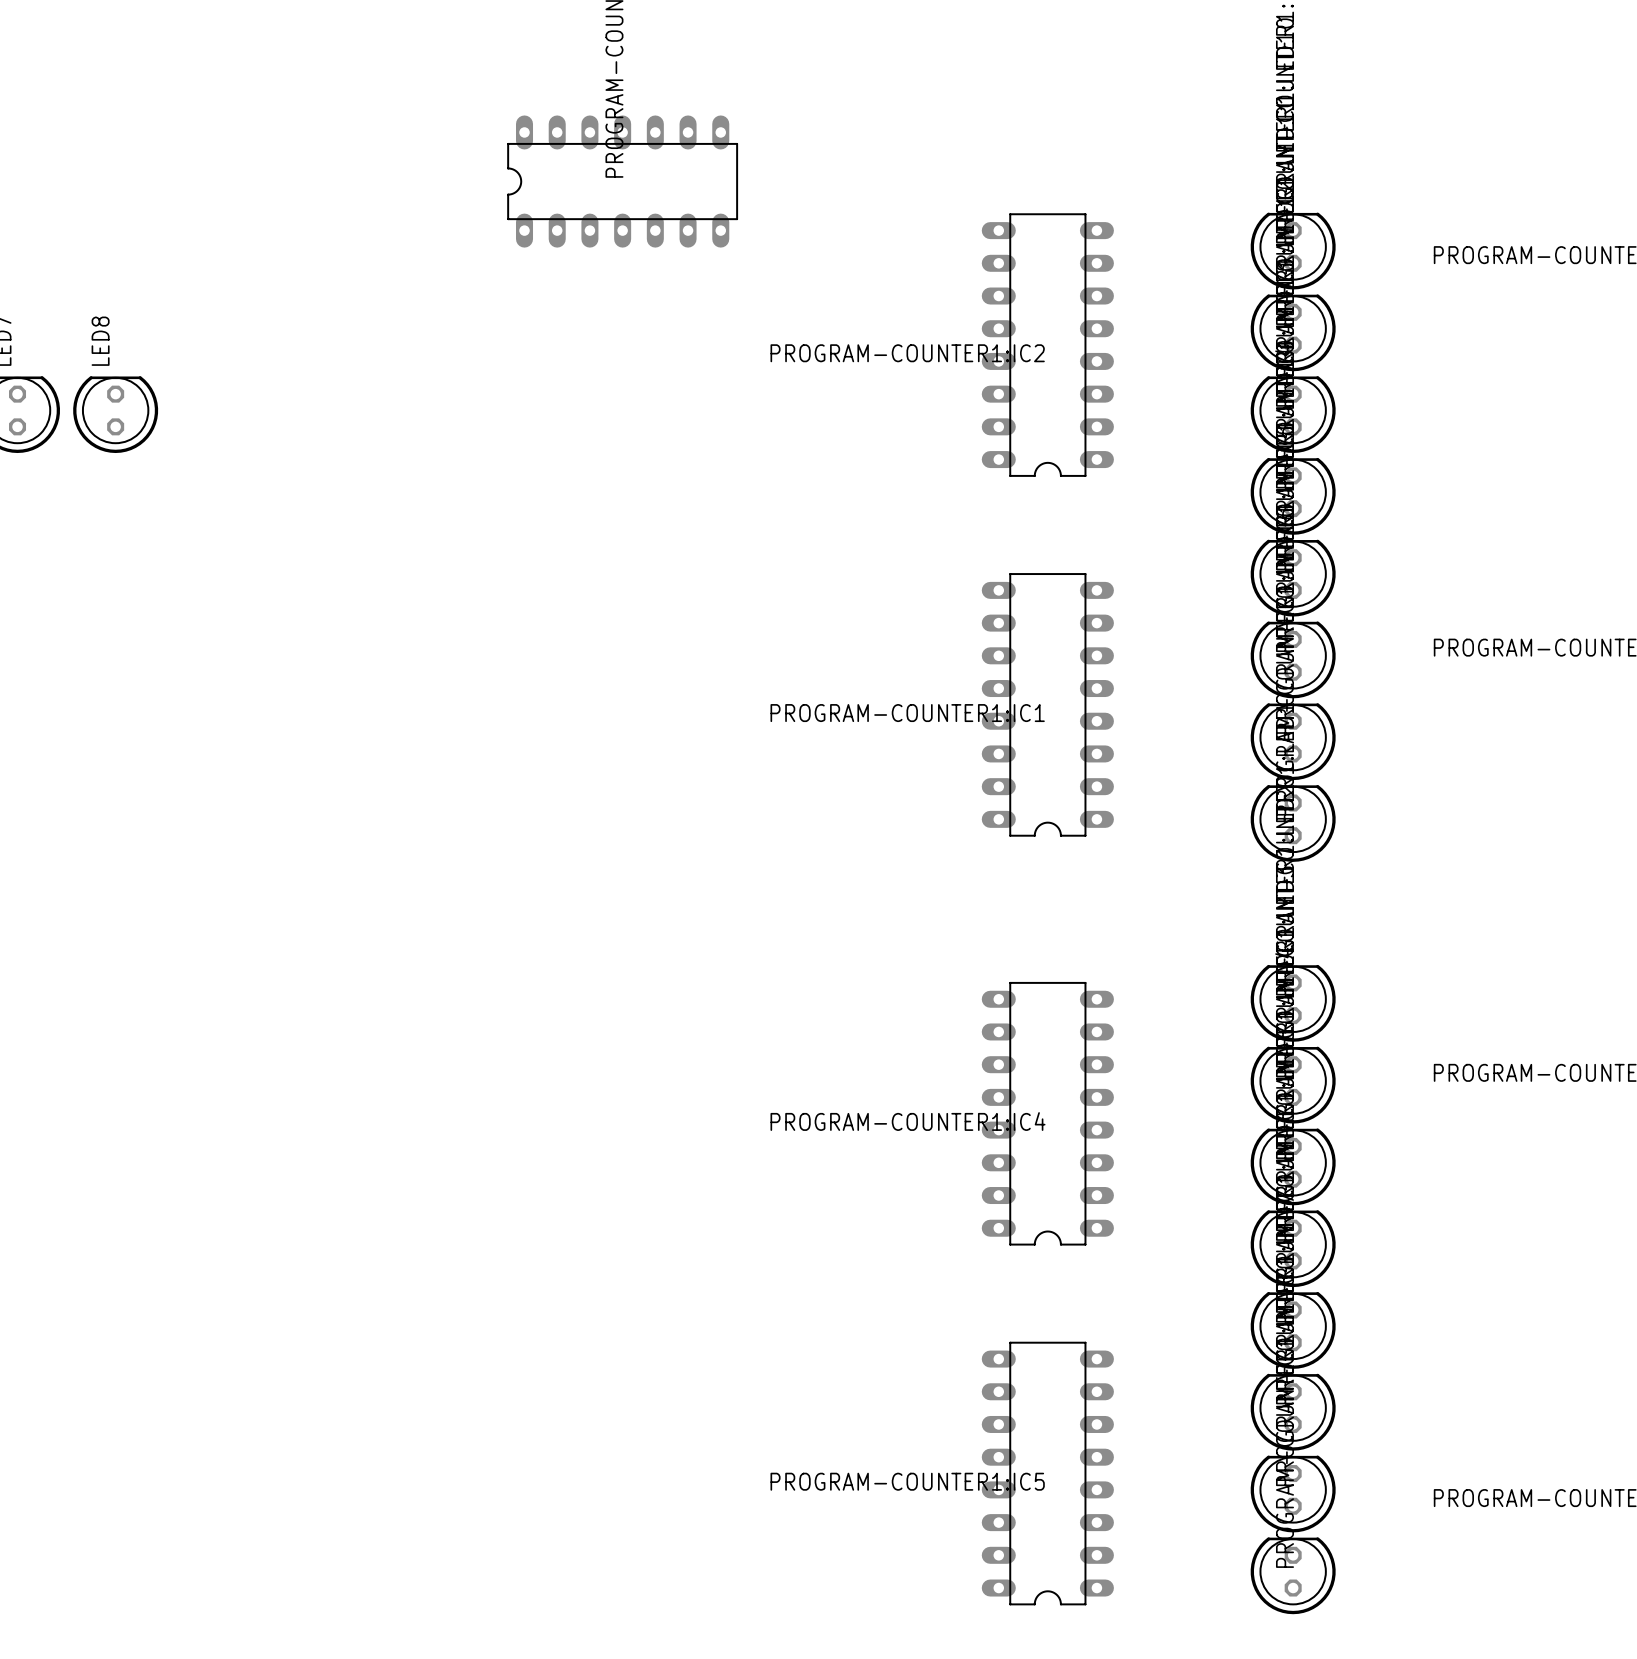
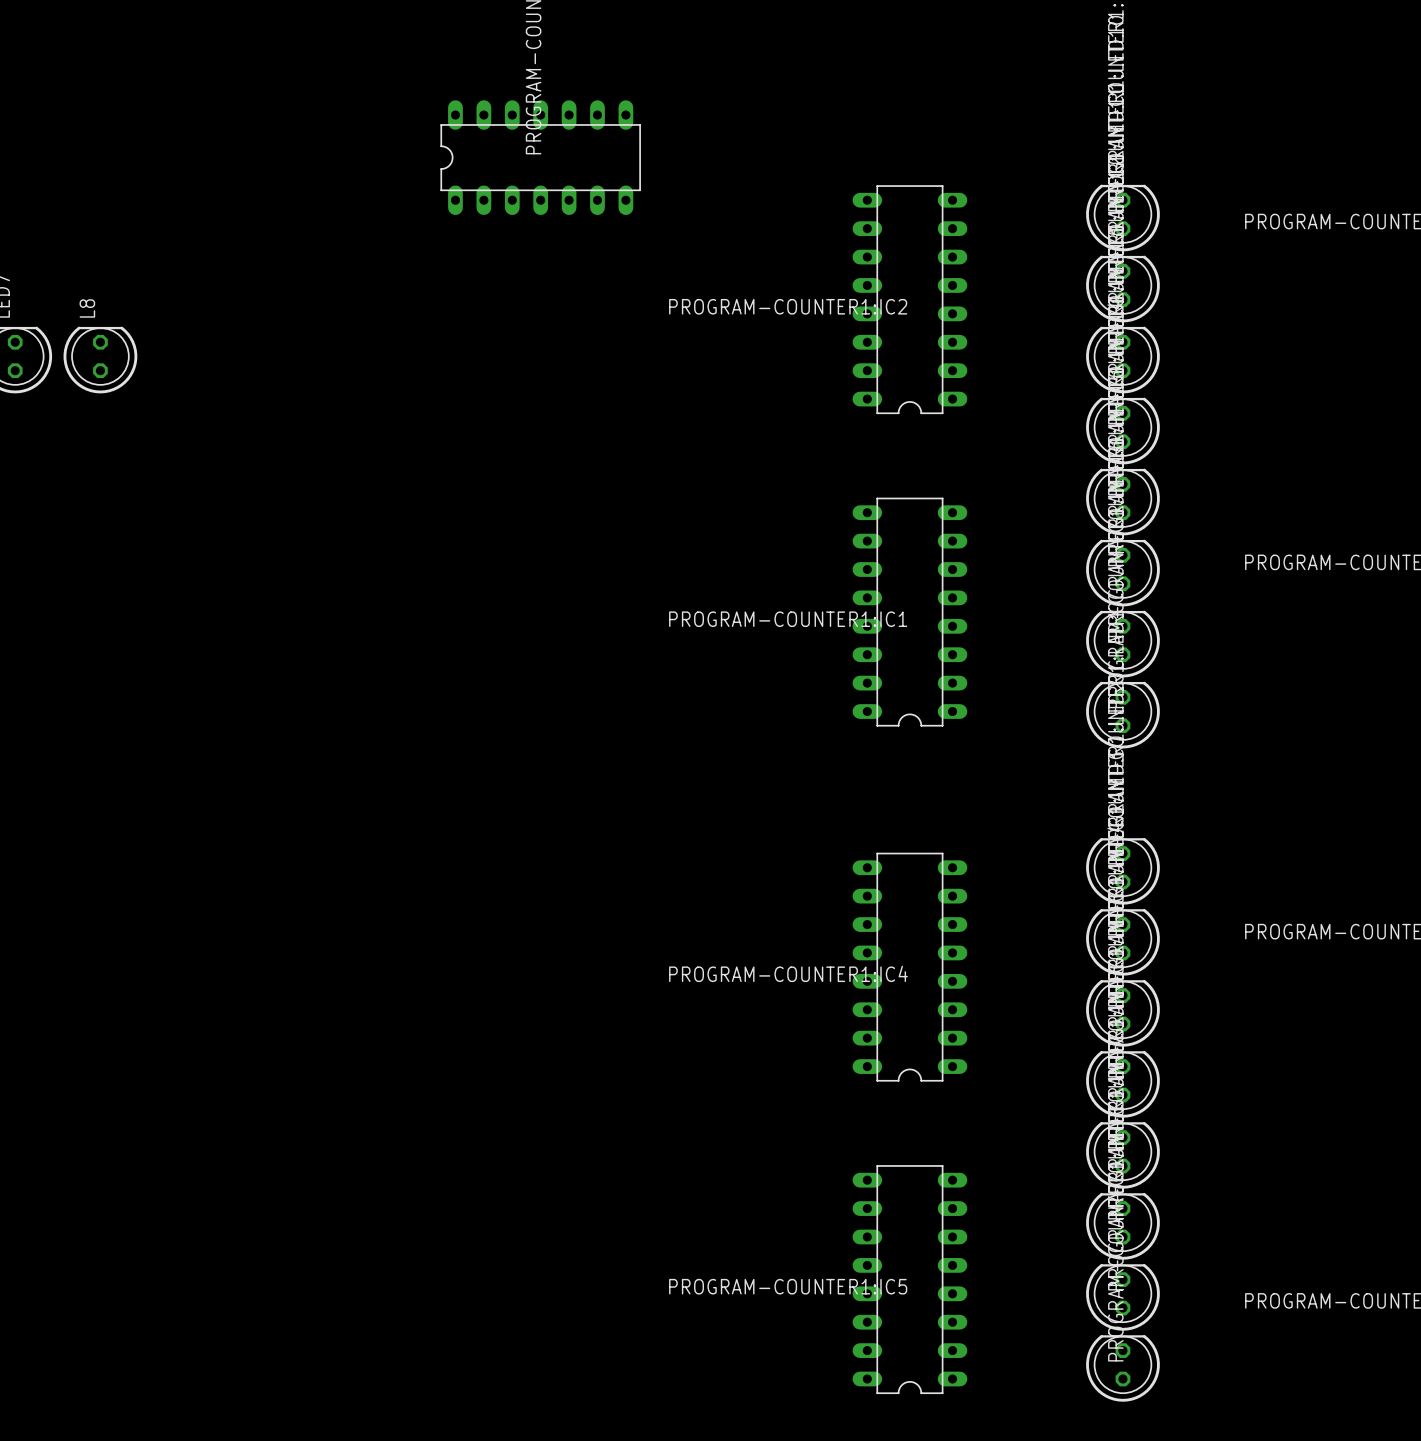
LED8 name: LED8 (100, 341) -> L8 (87, 308)

